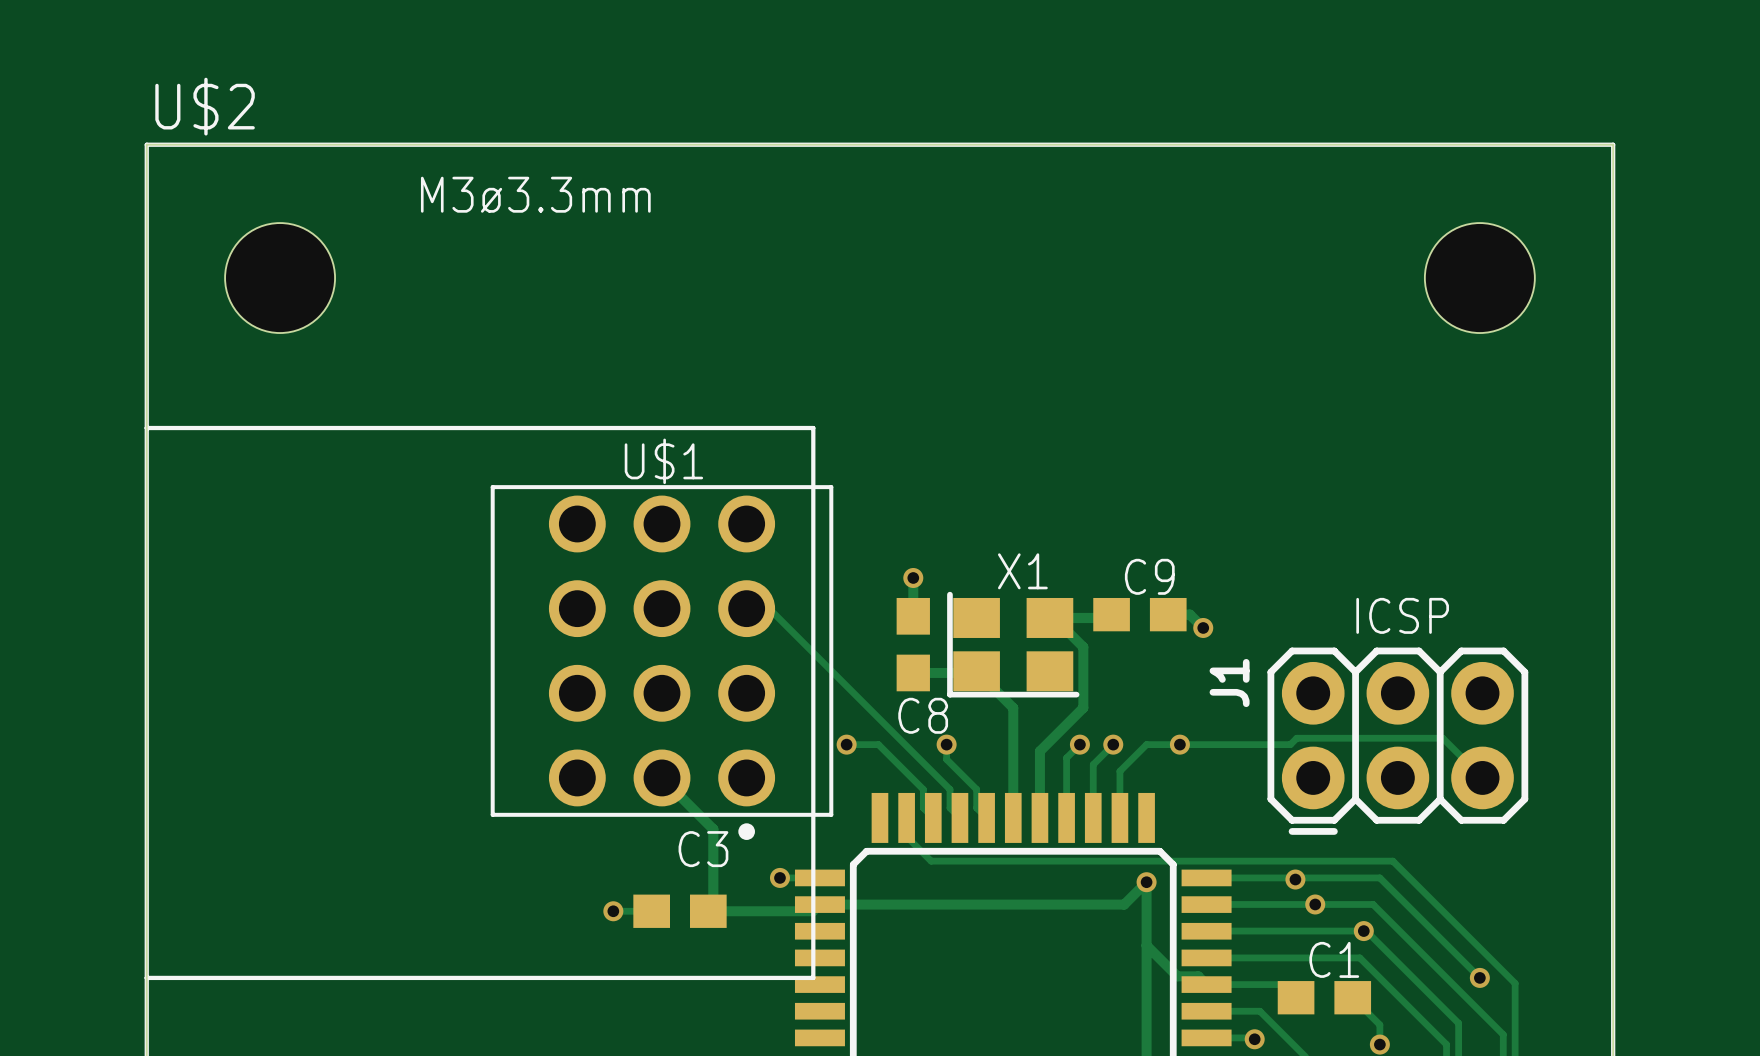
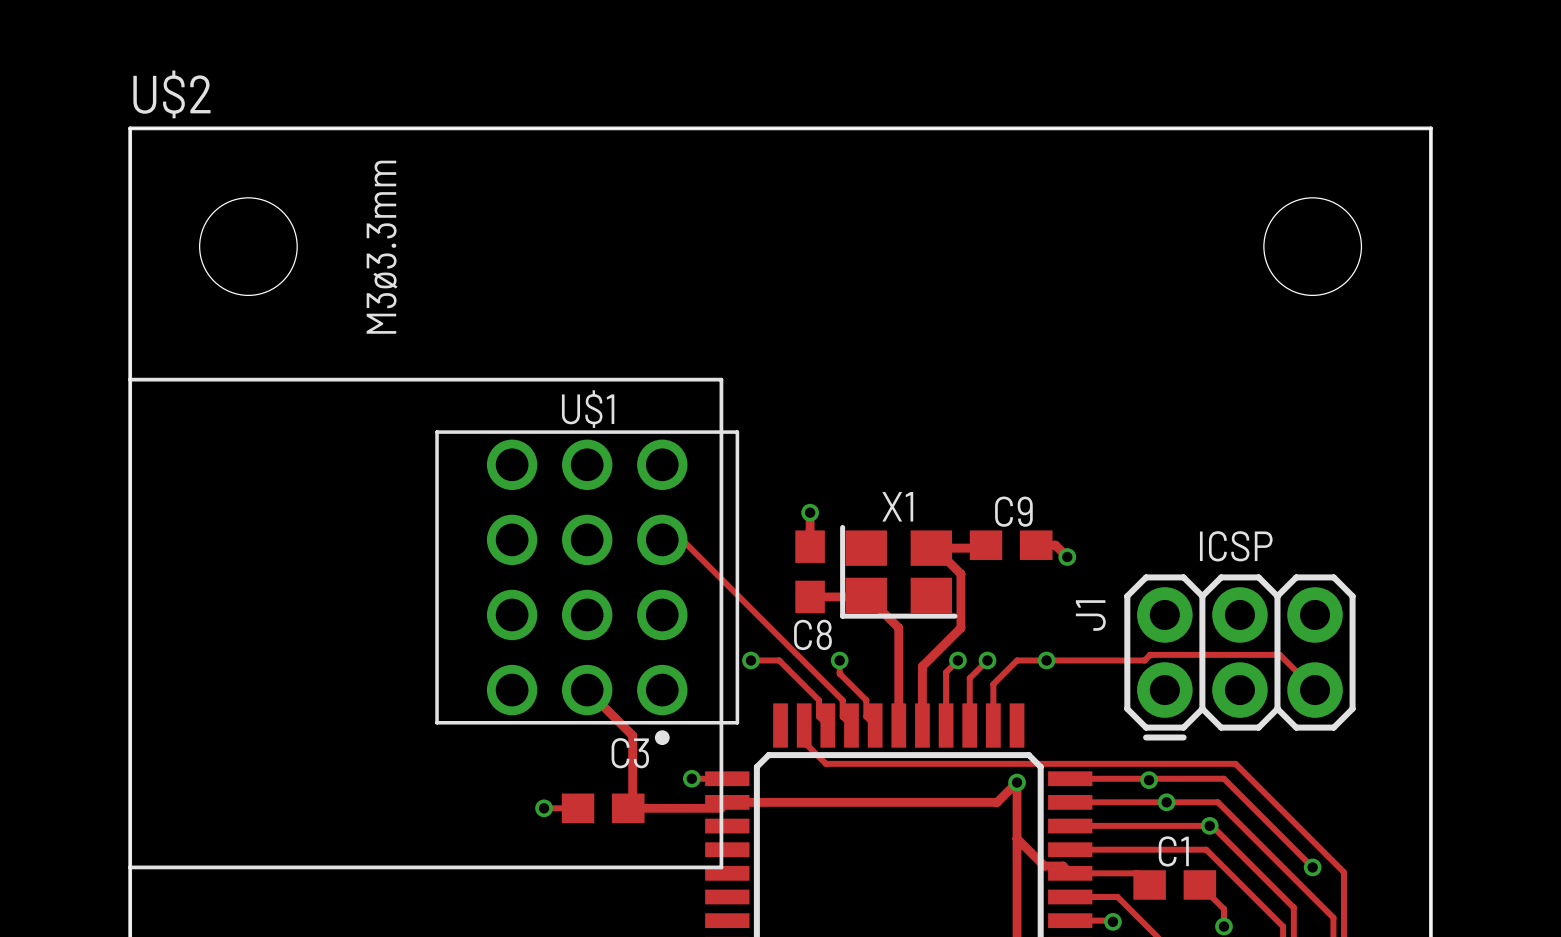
text rotation: 0° (535, 194) -> 90° counterclockwise (382, 247)

